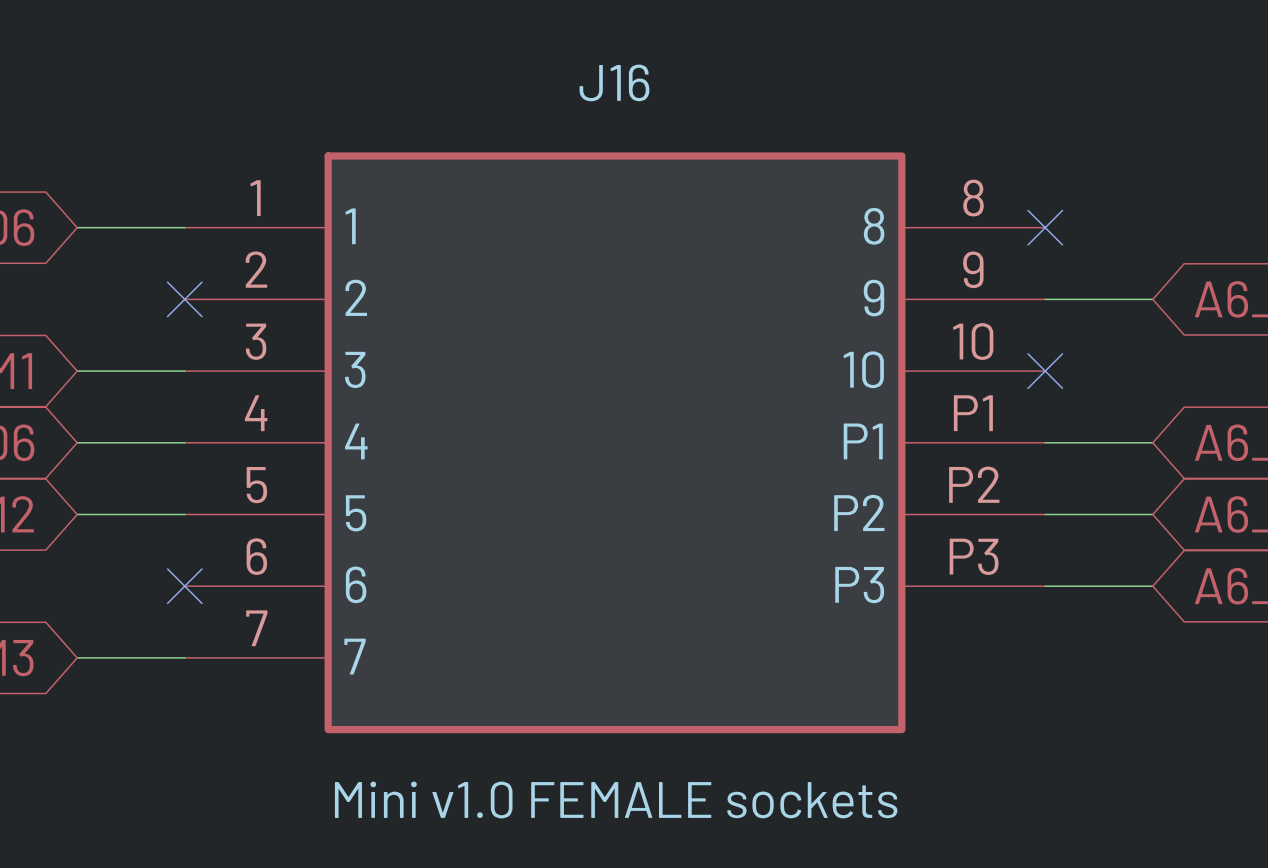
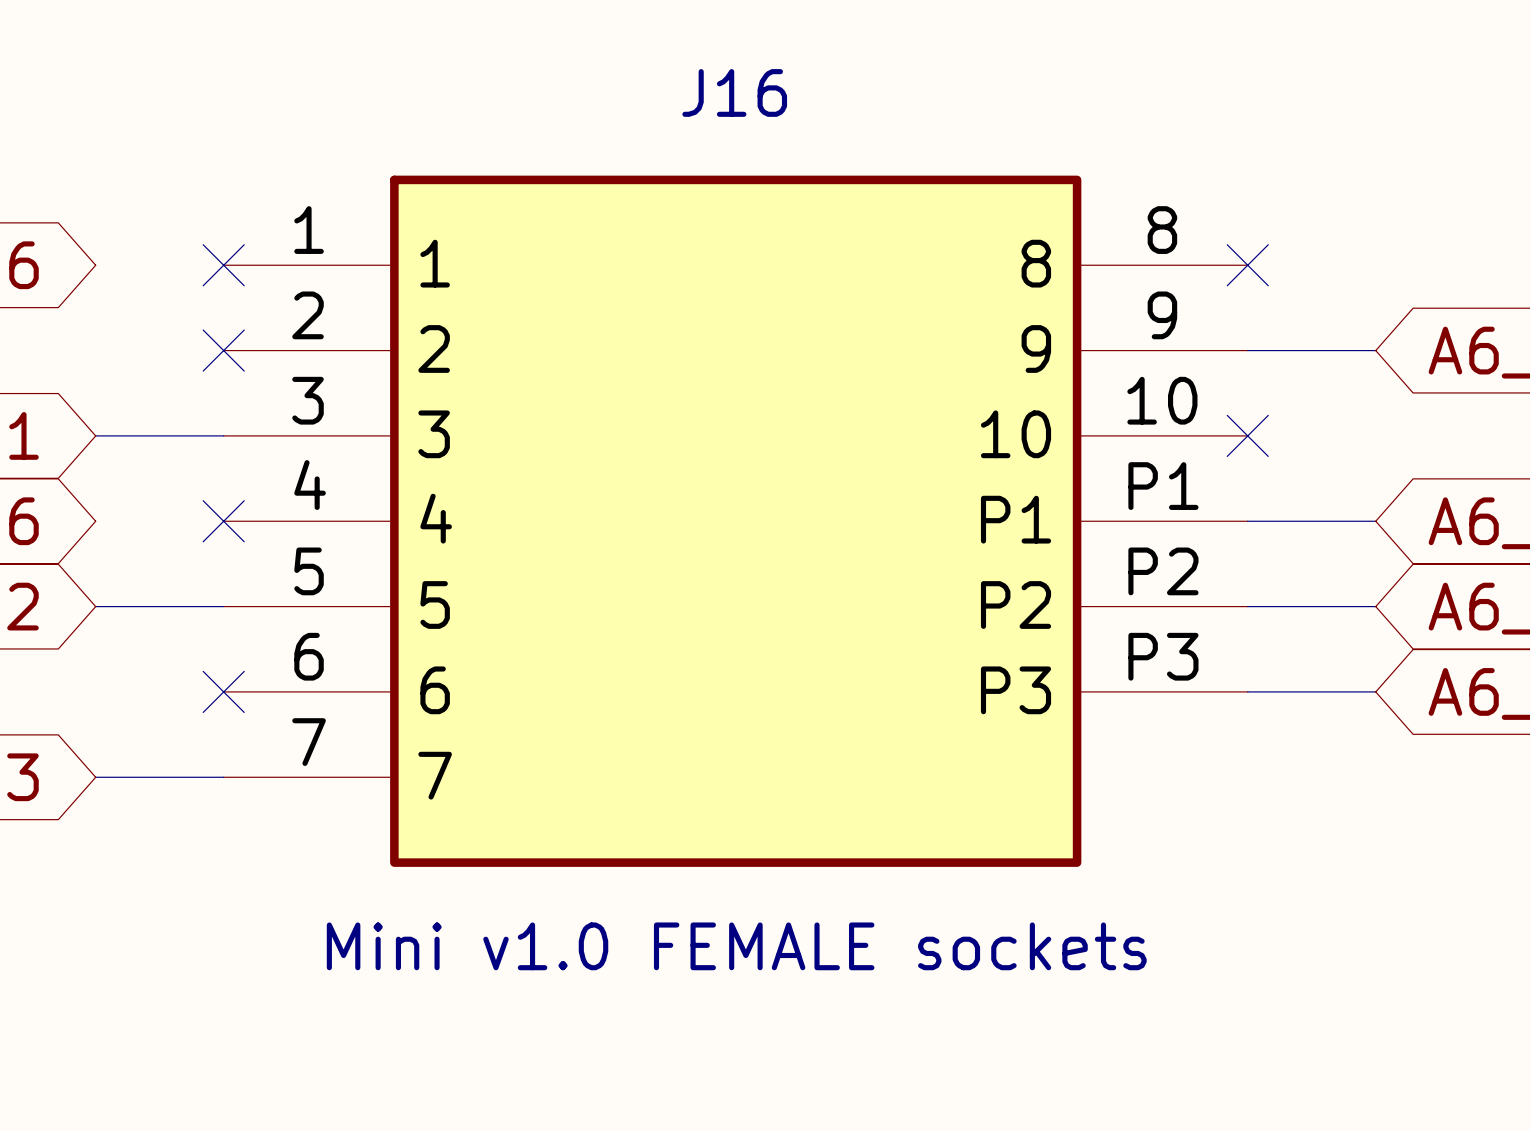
wire: (77, 227) (184, 227) -> none
no-connect mark: none -> (223, 265)
wire: (77, 442) (184, 442) -> none
no-connect mark: none -> (223, 521)

